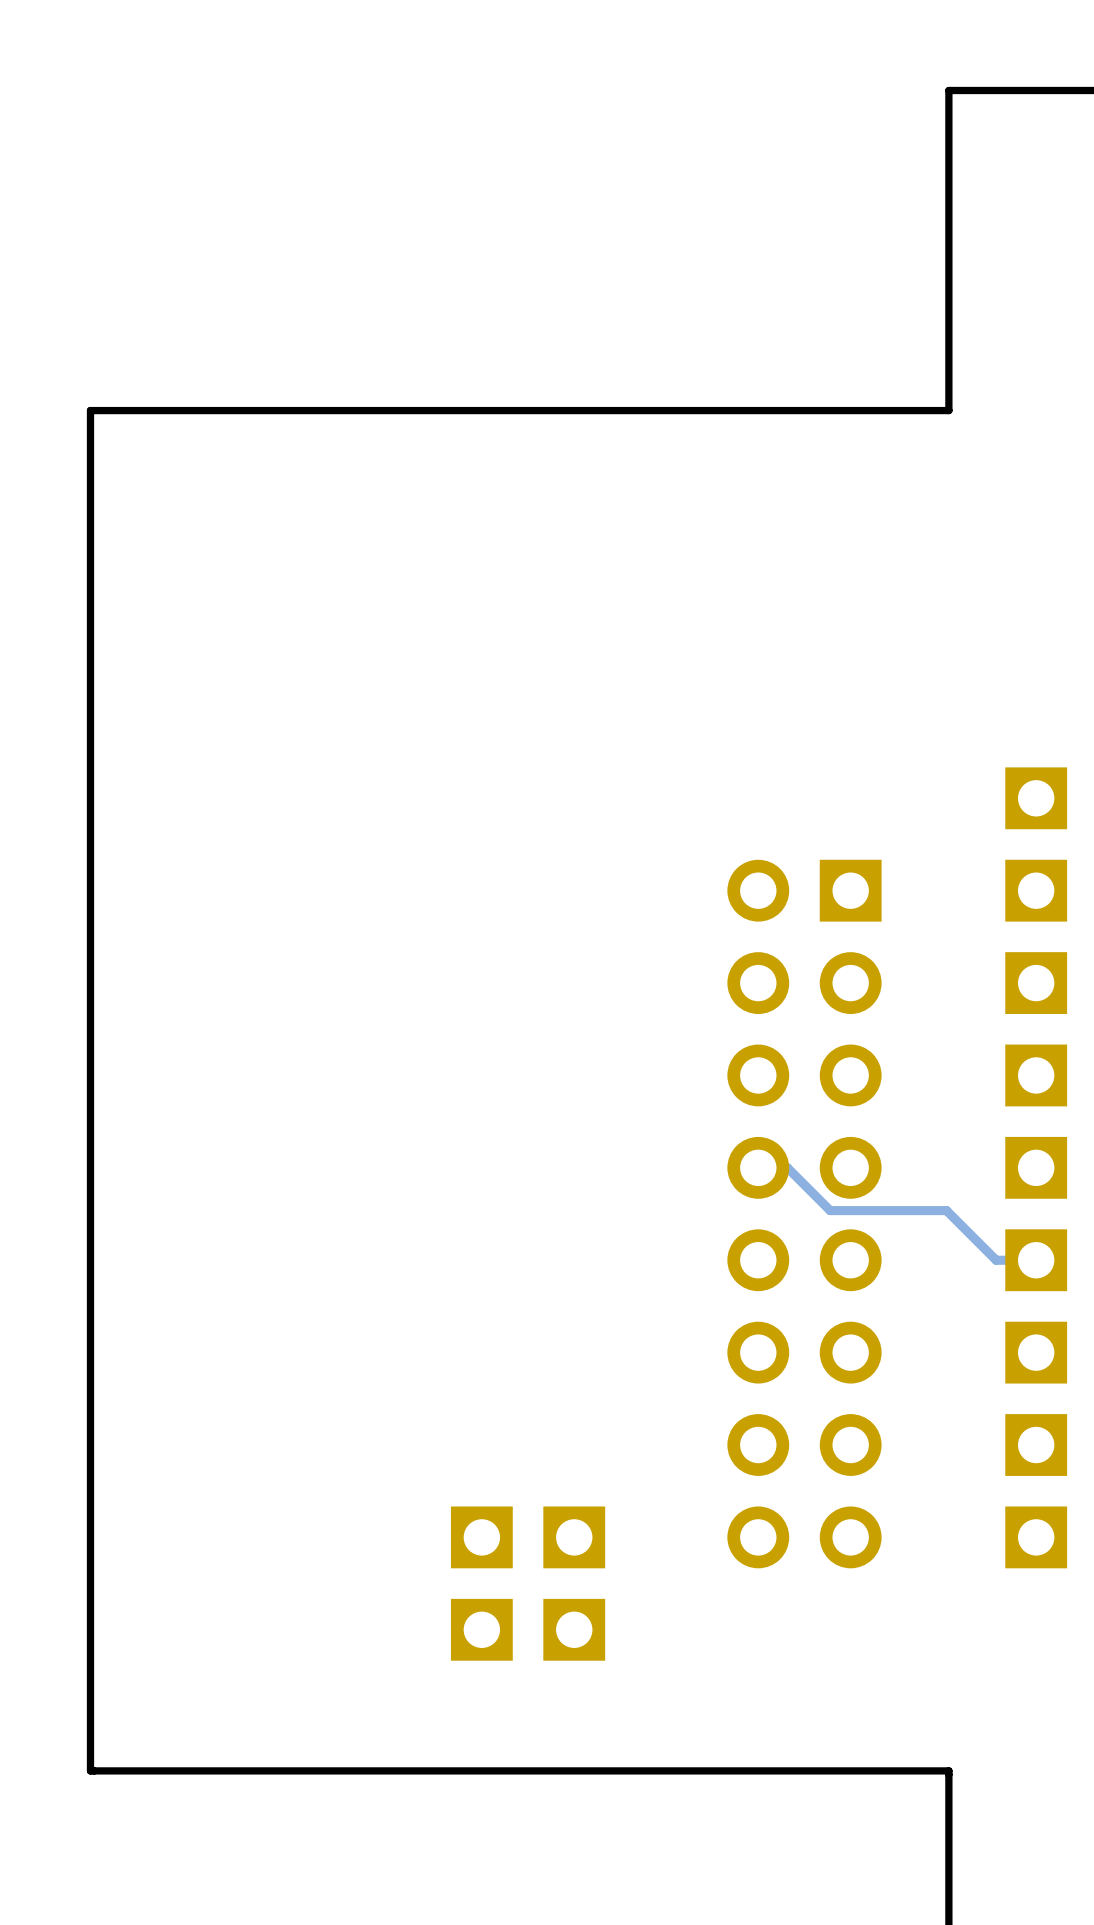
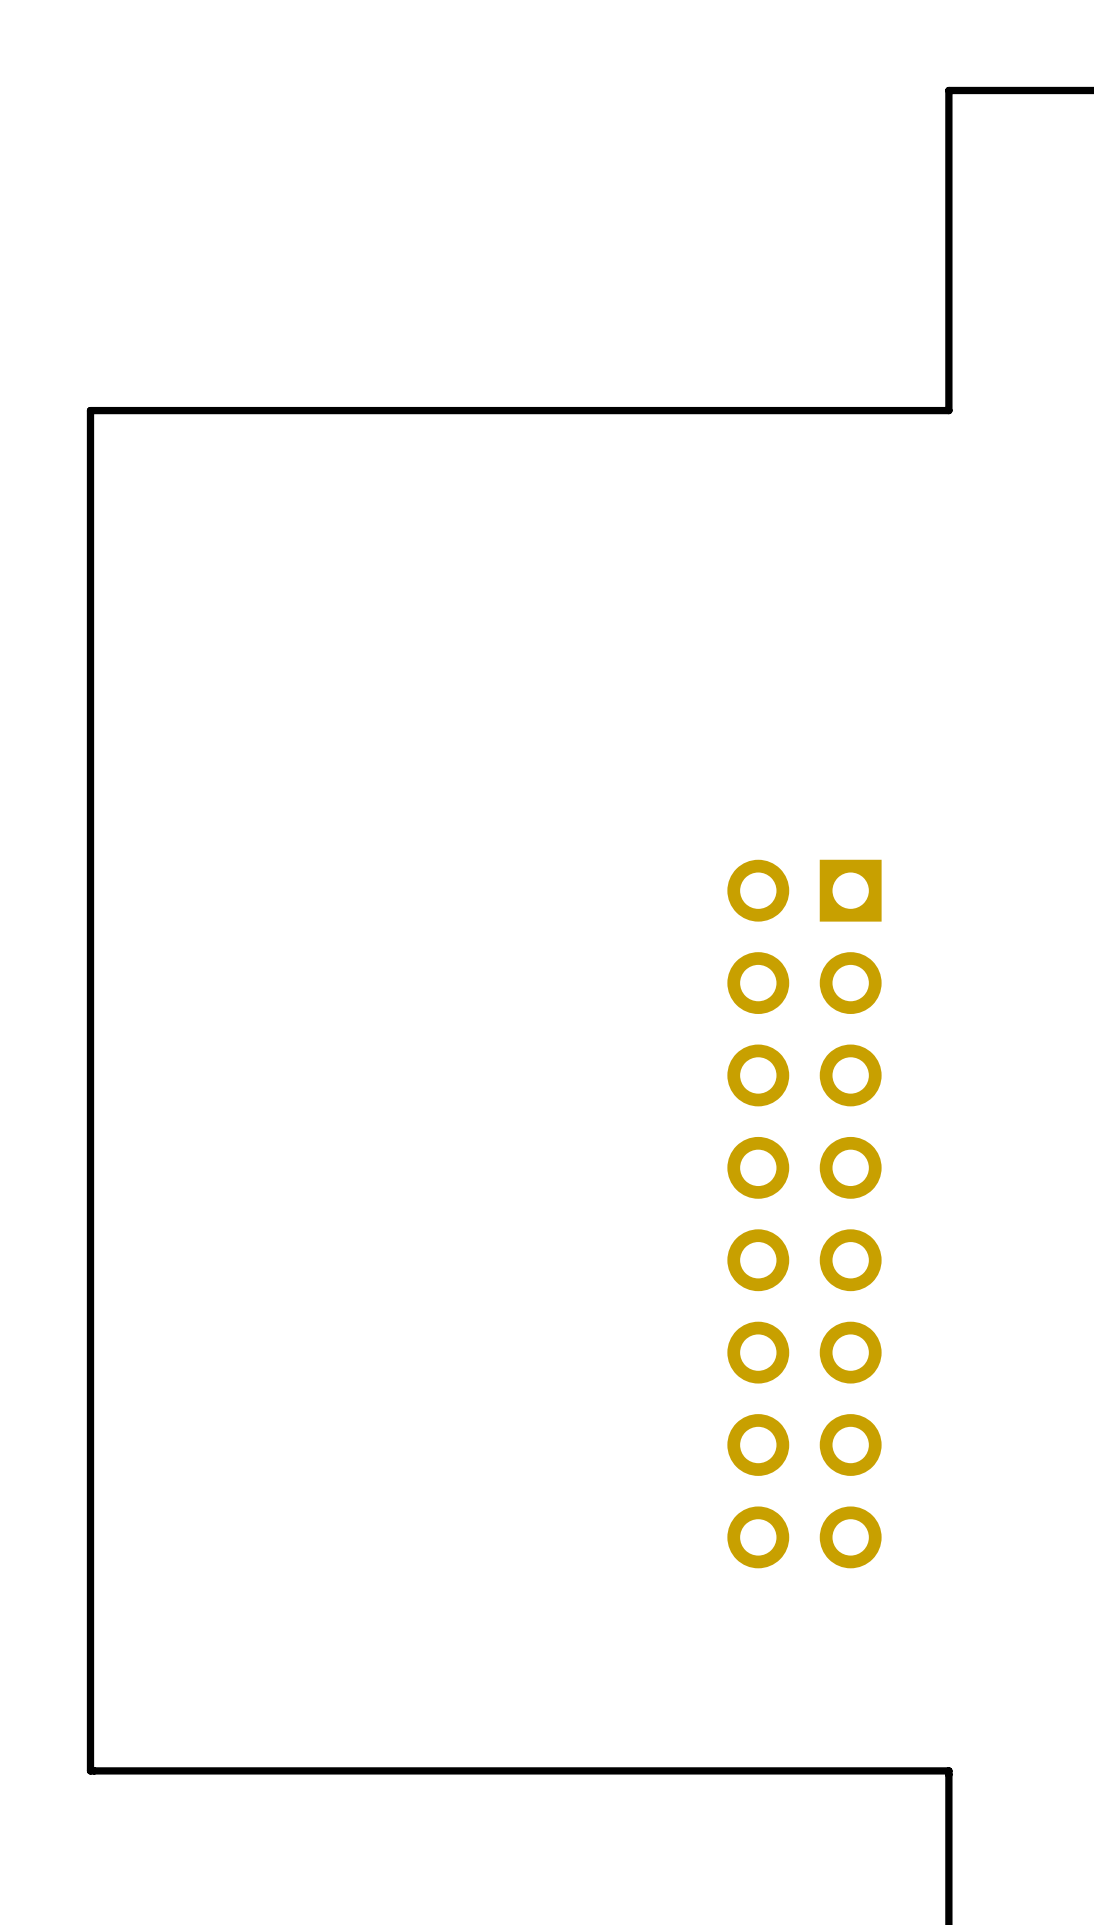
part: (1036, 798) -> none
part: (1036, 890) -> none
part: (1036, 983) -> none
part: (1036, 1075) -> none
track: (758, 1167) (787, 1167) (830, 1210) (946, 1210) (996, 1260) (1036, 1260) -> none
part: (1036, 1167) -> none
part: (1036, 1260) -> none
part: (1036, 1352) -> none
part: (1036, 1445) -> none
part: (481, 1537) -> none
part: (574, 1537) -> none
part: (1036, 1537) -> none
part: (481, 1629) -> none
part: (574, 1629) -> none

